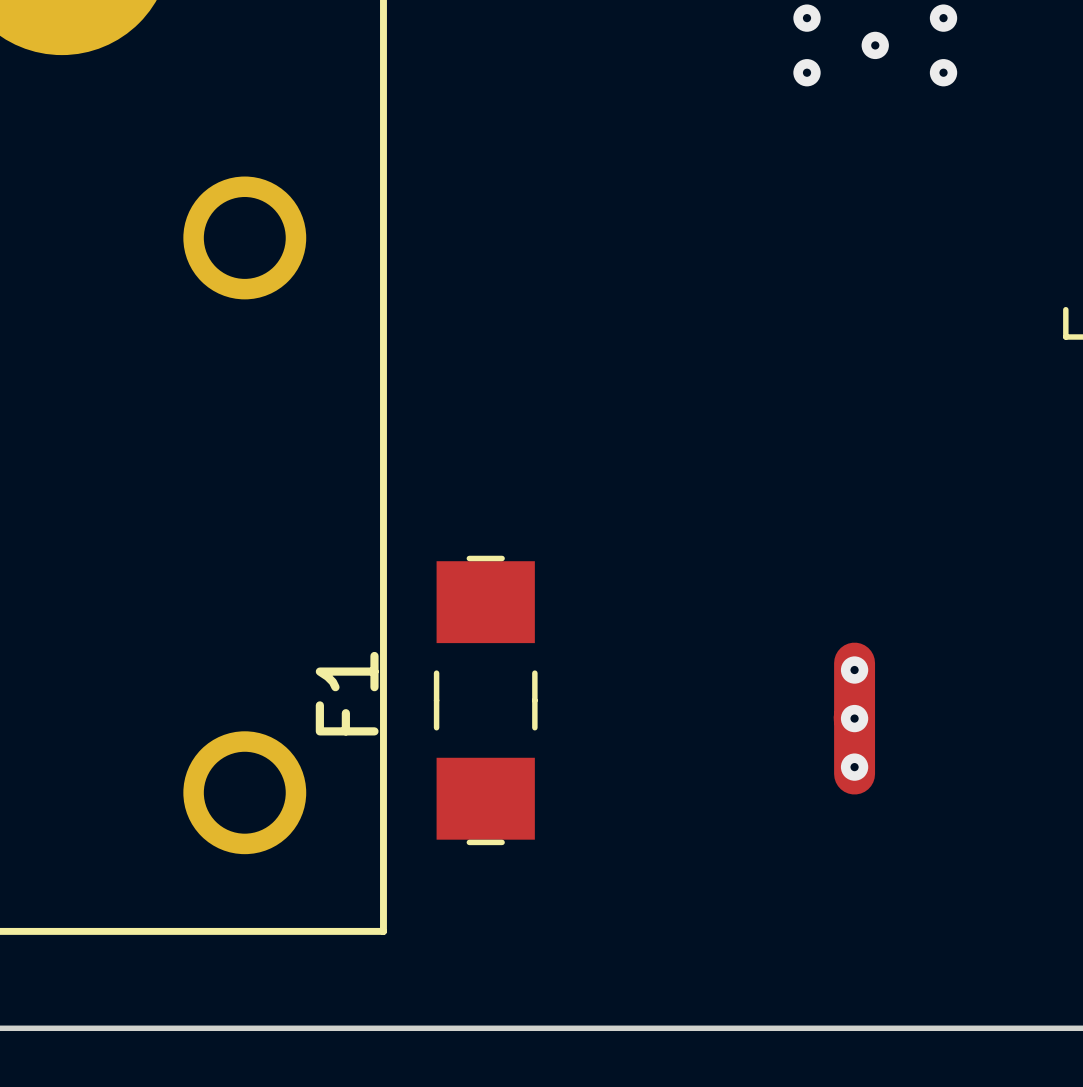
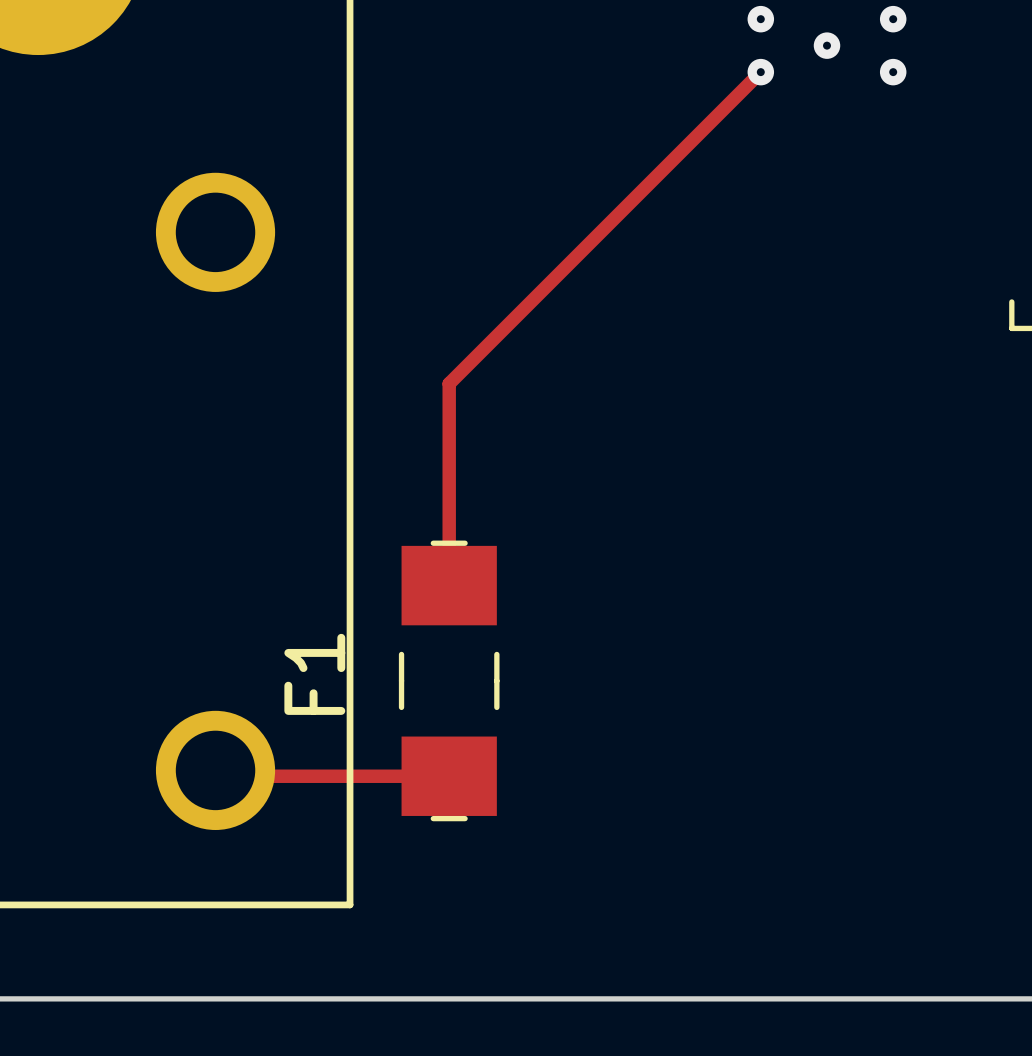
track: none -> (760, 72) (449, 383) (449, 585)
track: (854, 663) (854, 774) -> none
via: (854, 670) -> none
via: (854, 718) -> none
via: (854, 767) -> none
track: none -> (215, 770) (221, 776) (449, 776)

